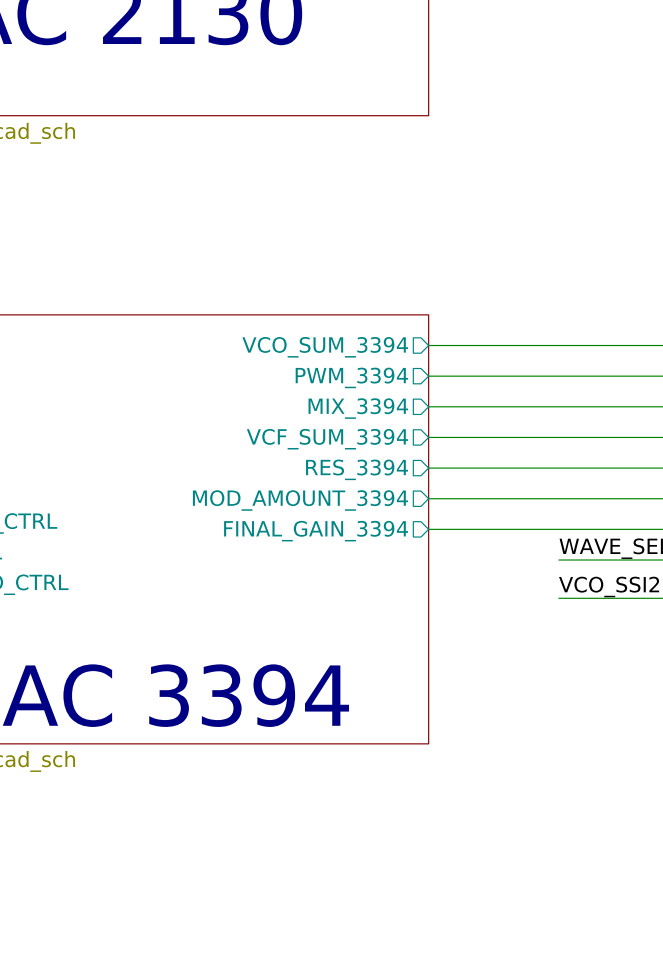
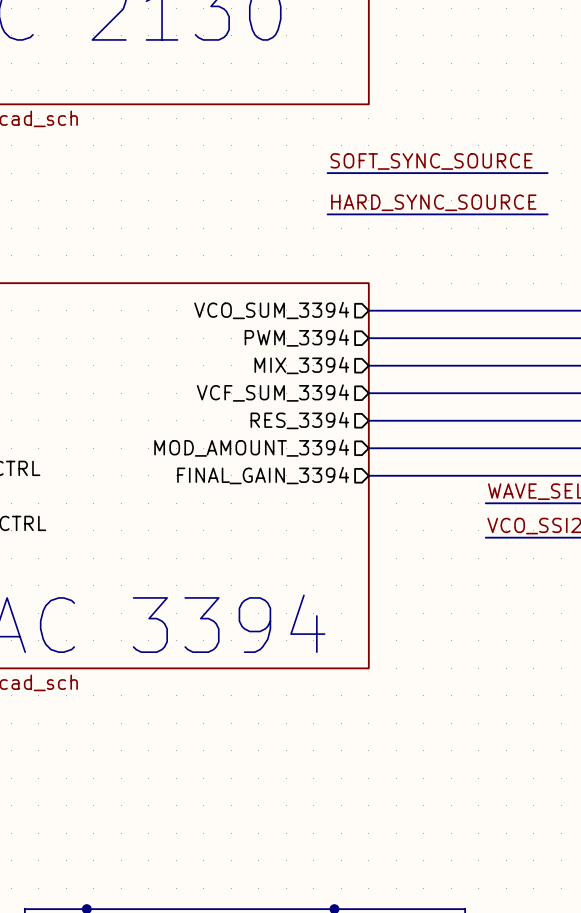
label: none -> SOFT_SYNC_SOURCE (431, 161)
wire: none -> (327, 173) (547, 173)
label: none -> HARD_SYNC_SOURCE (433, 202)
wire: none -> (327, 214) (547, 214)

